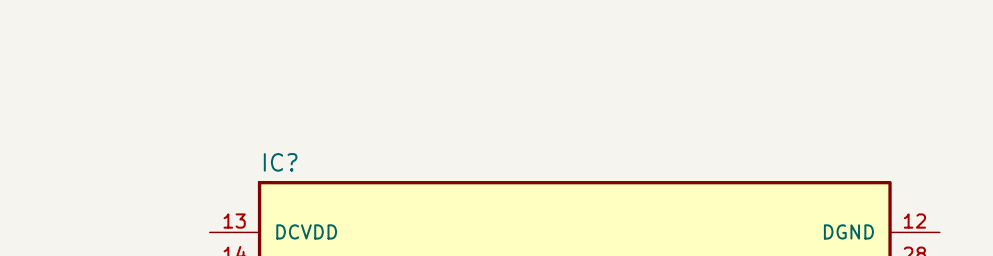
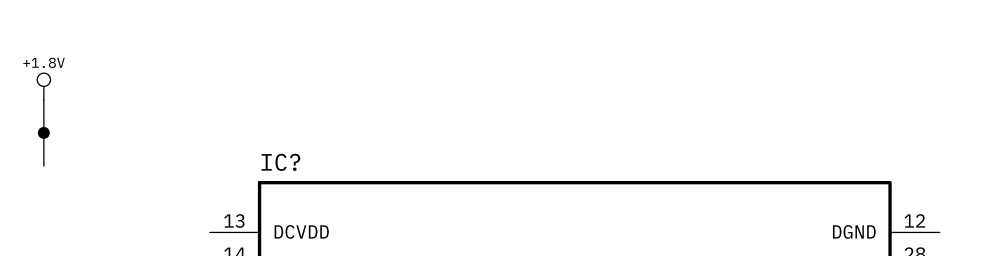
power symbol: none -> +1.8V (43, 86)
wire: none -> (43, 99) (43, 166)
junction: none -> (43, 132)

